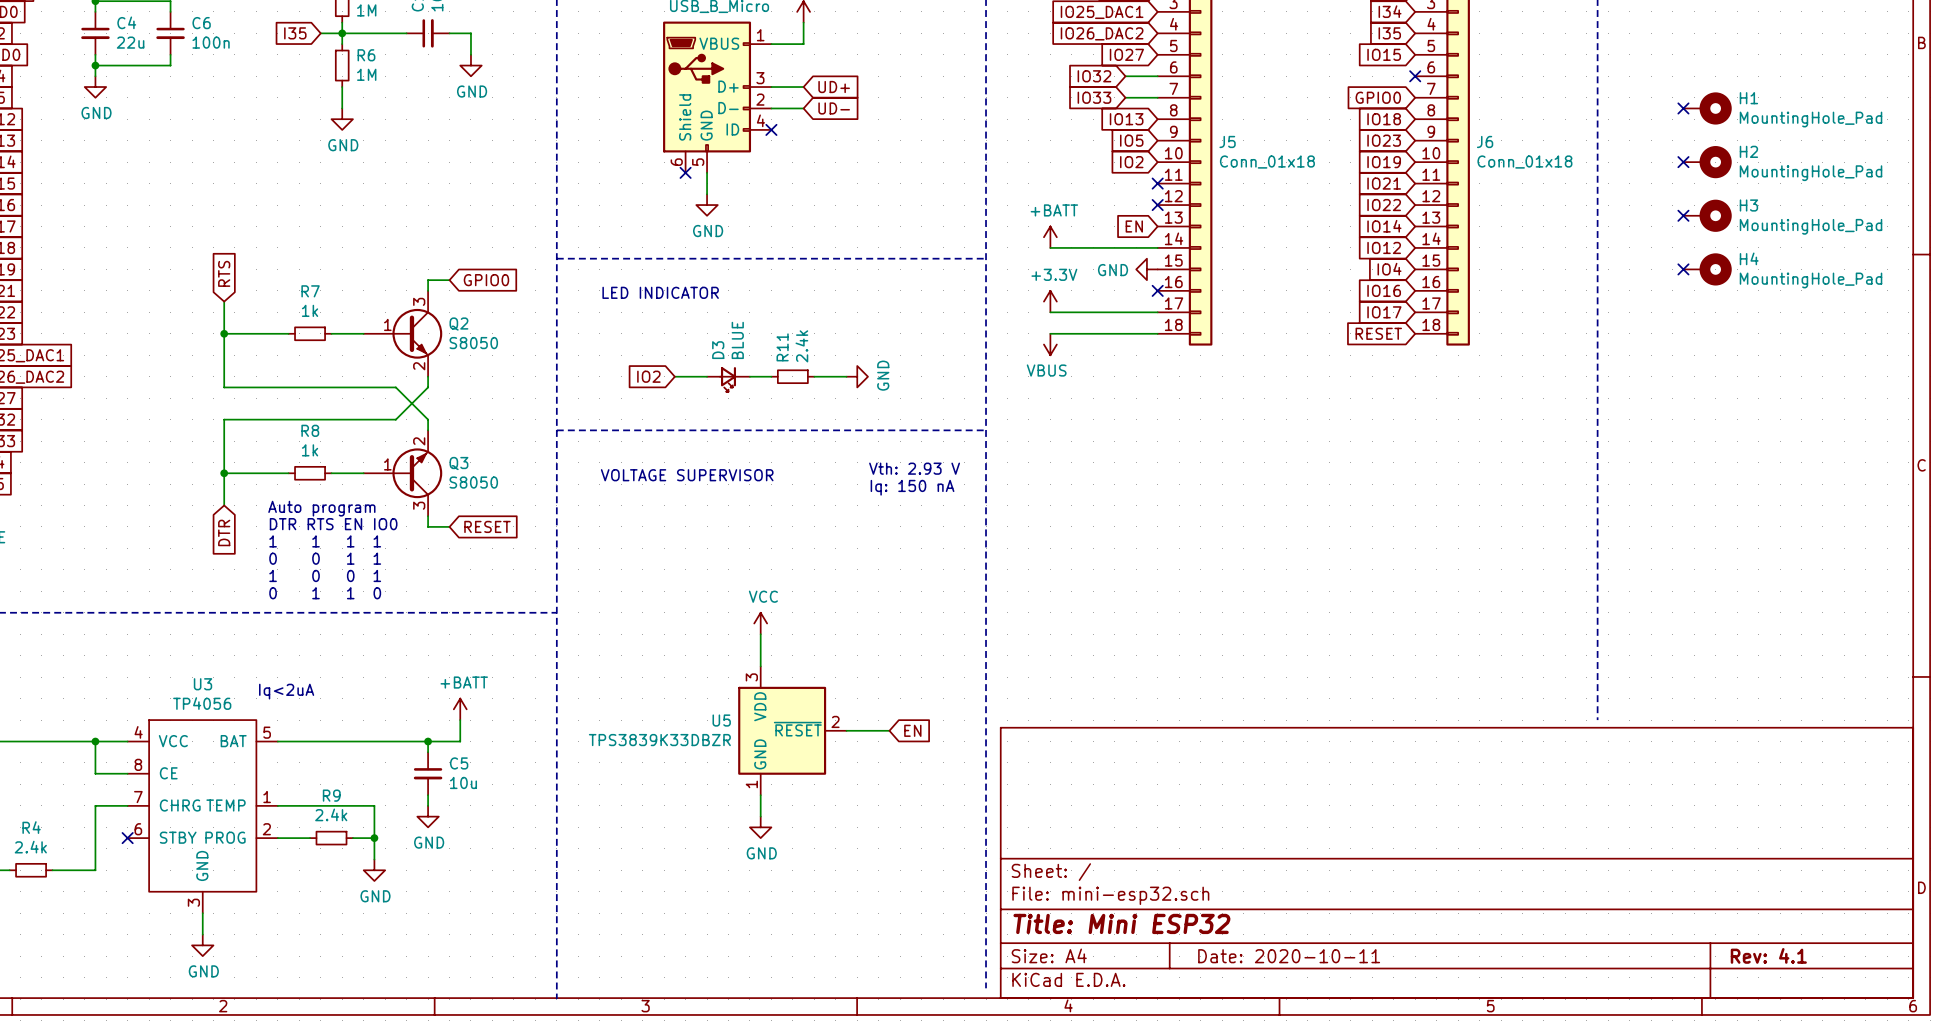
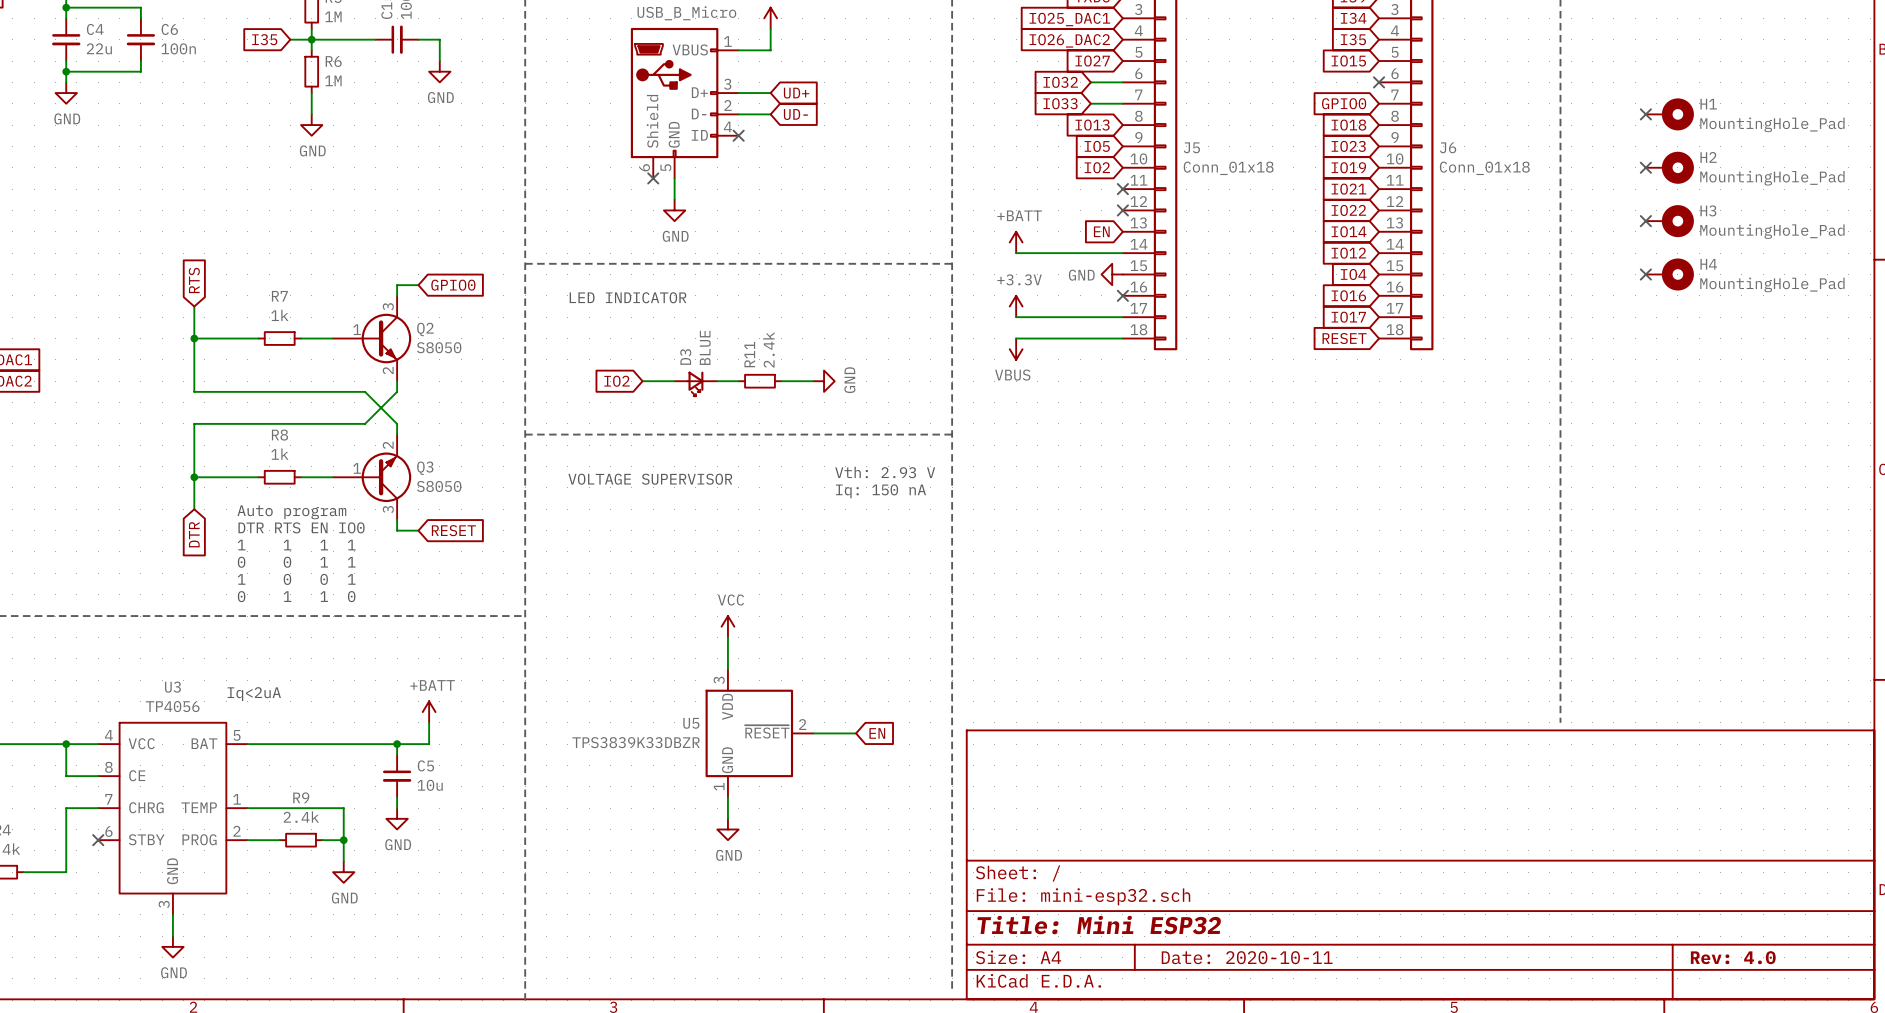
title block: Rev: 4.1 (1768, 955) -> Rev: 4.0 (1733, 957)

